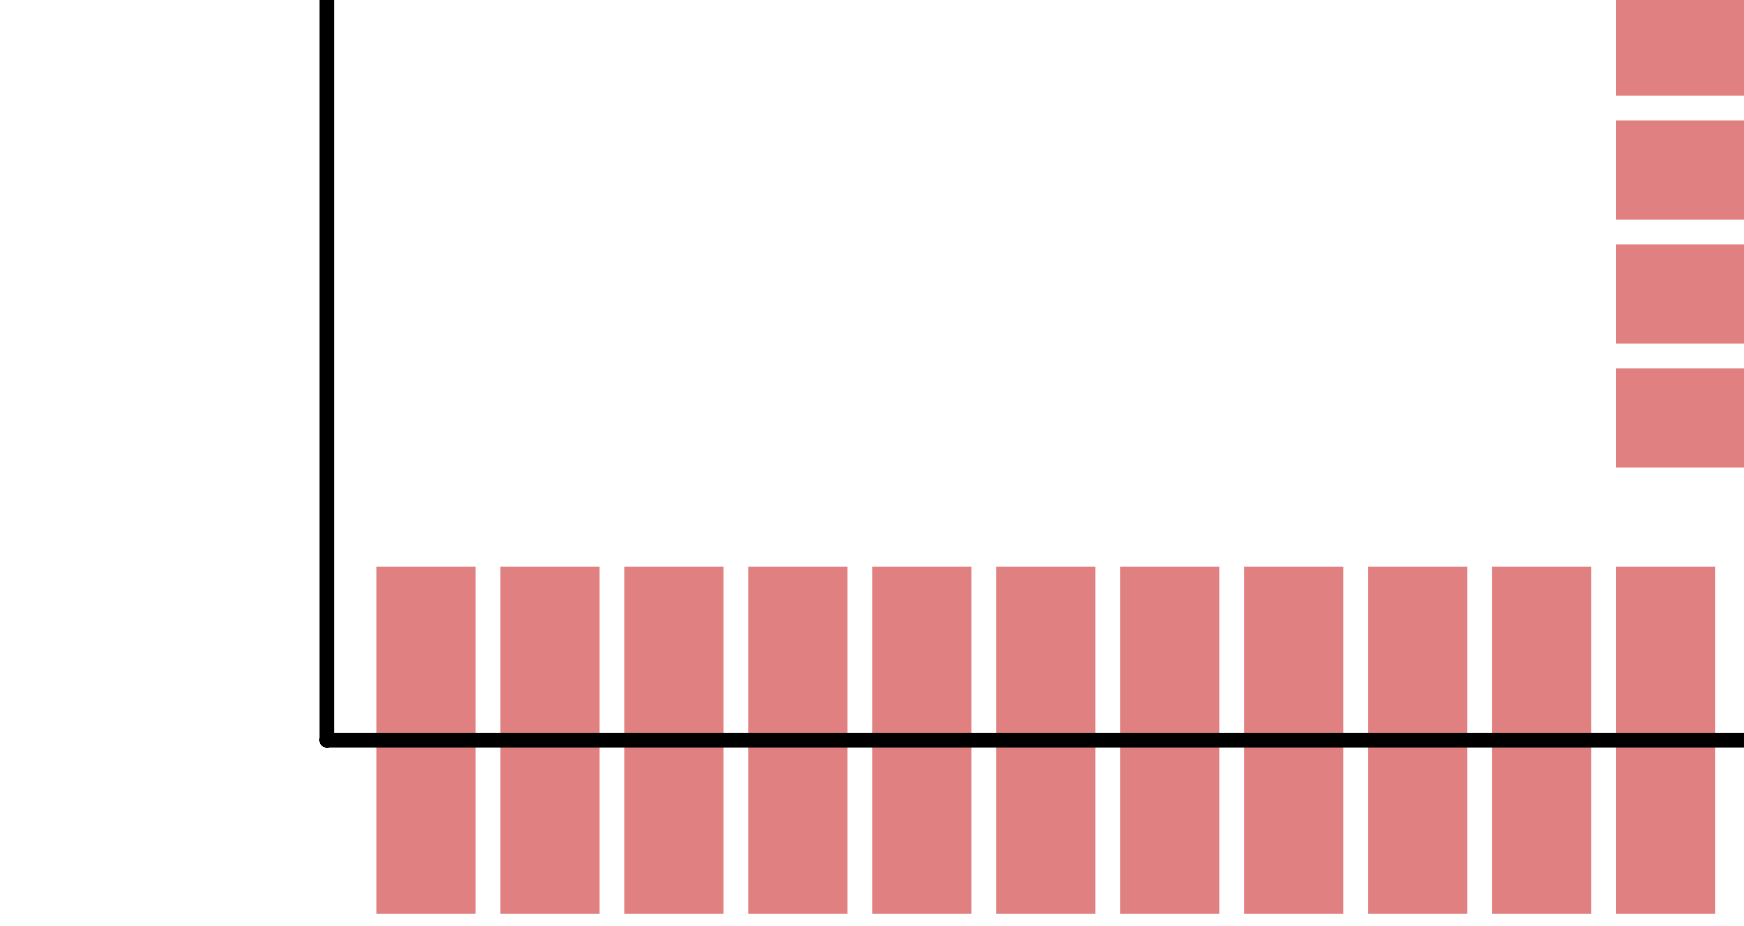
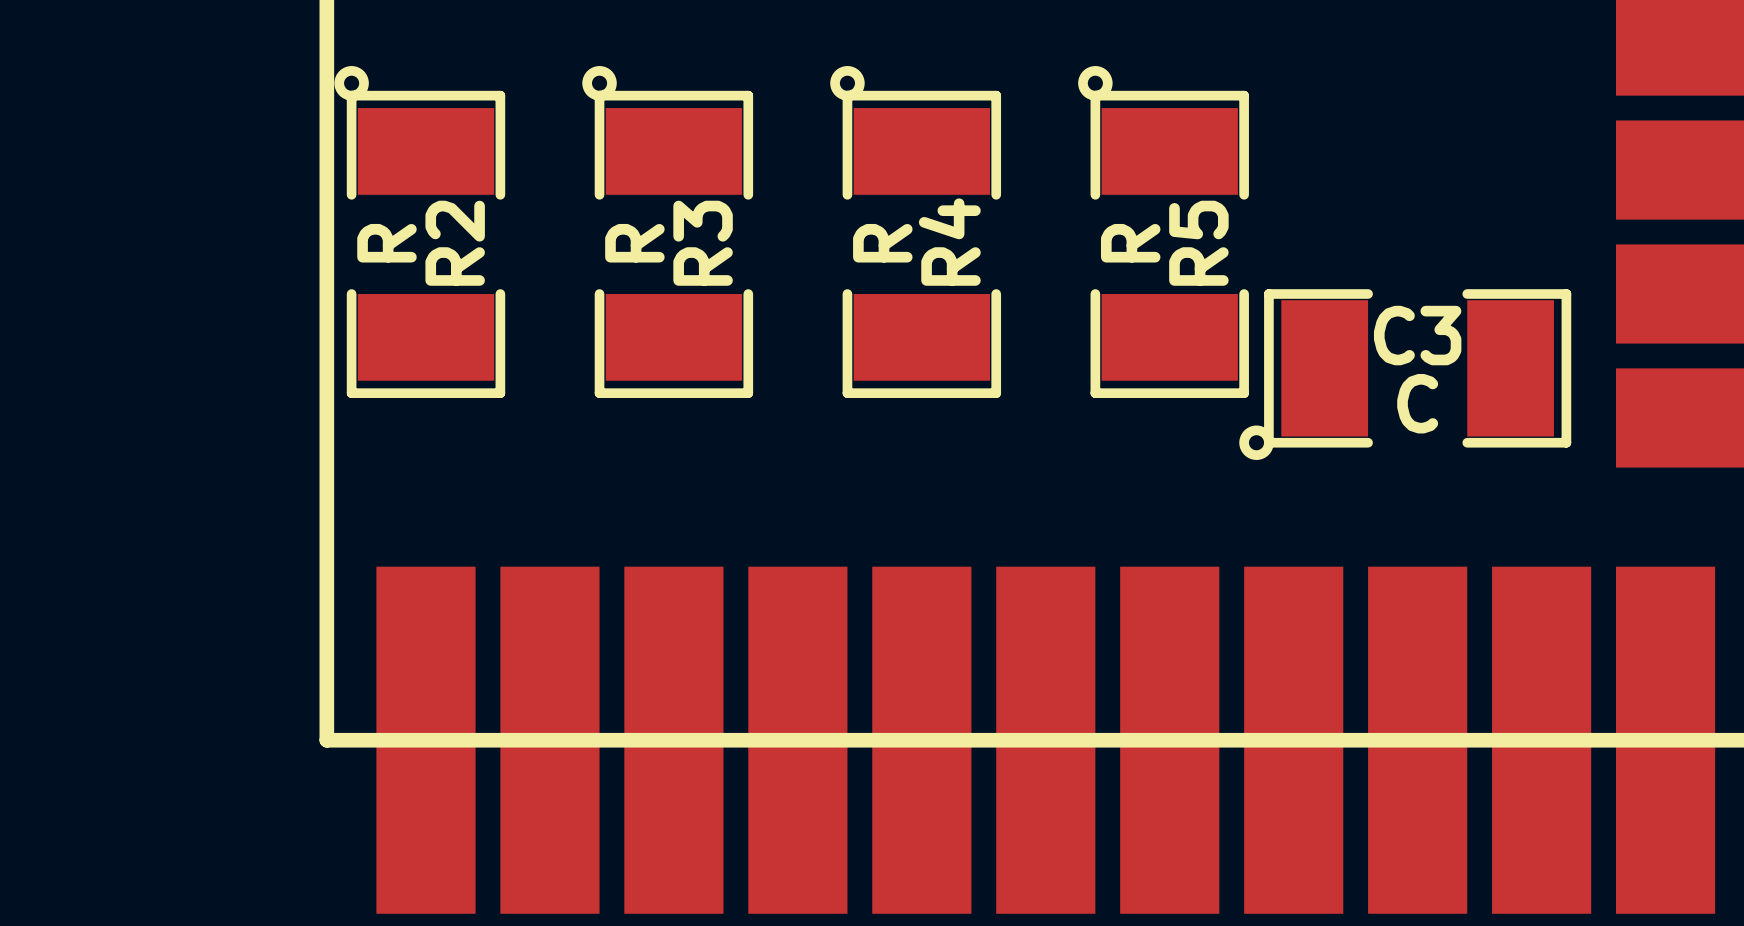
R2: none -> R (419, 232)
R3: none -> R (667, 232)
R4: none -> R (915, 232)
R5: none -> R (1163, 232)
C3: none -> C (1405, 374)

